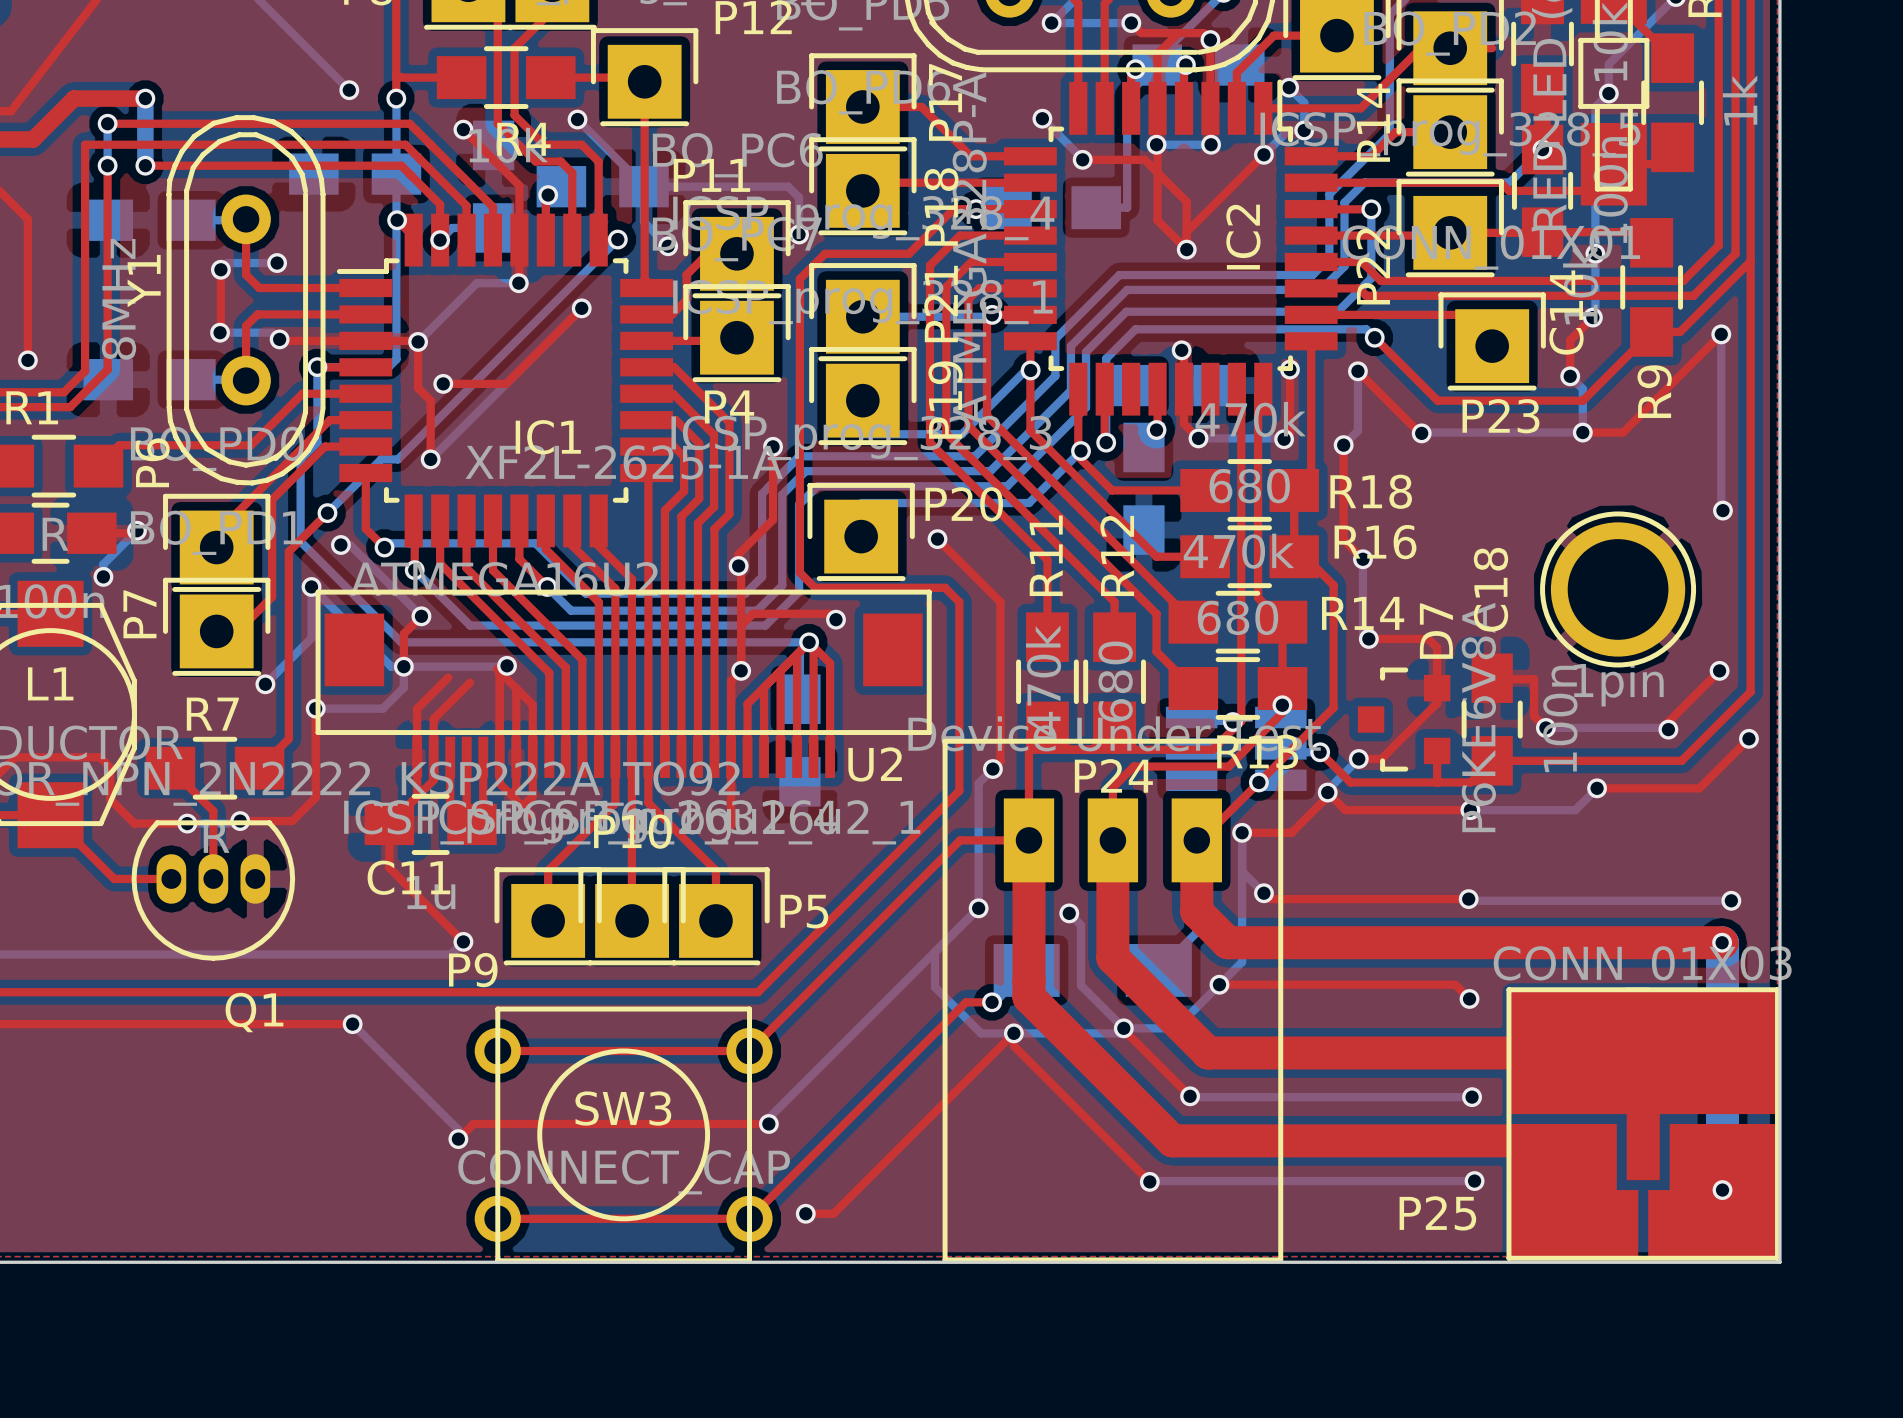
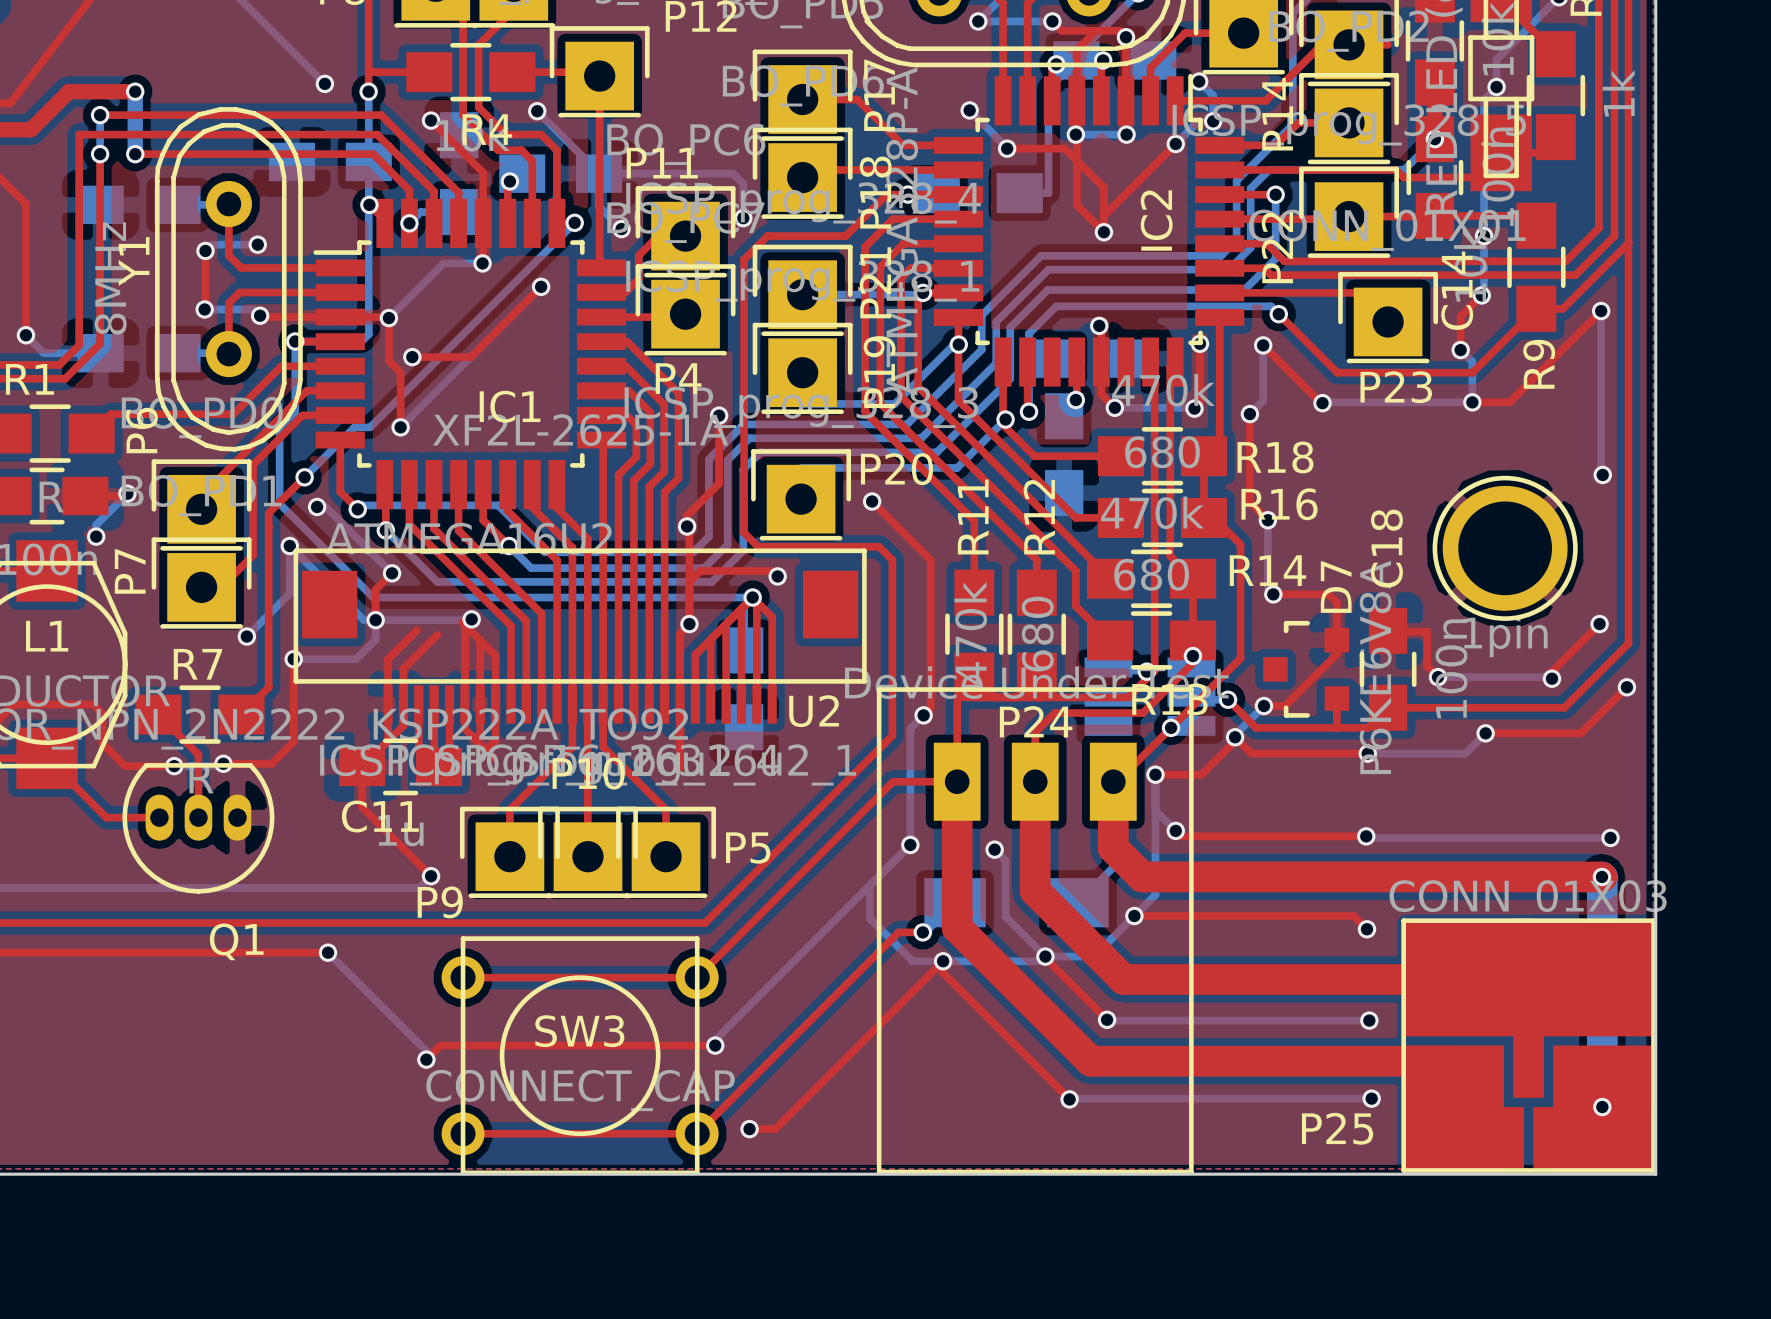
bottom track: none -> (25, 335) (43, 353) (100, 353)

